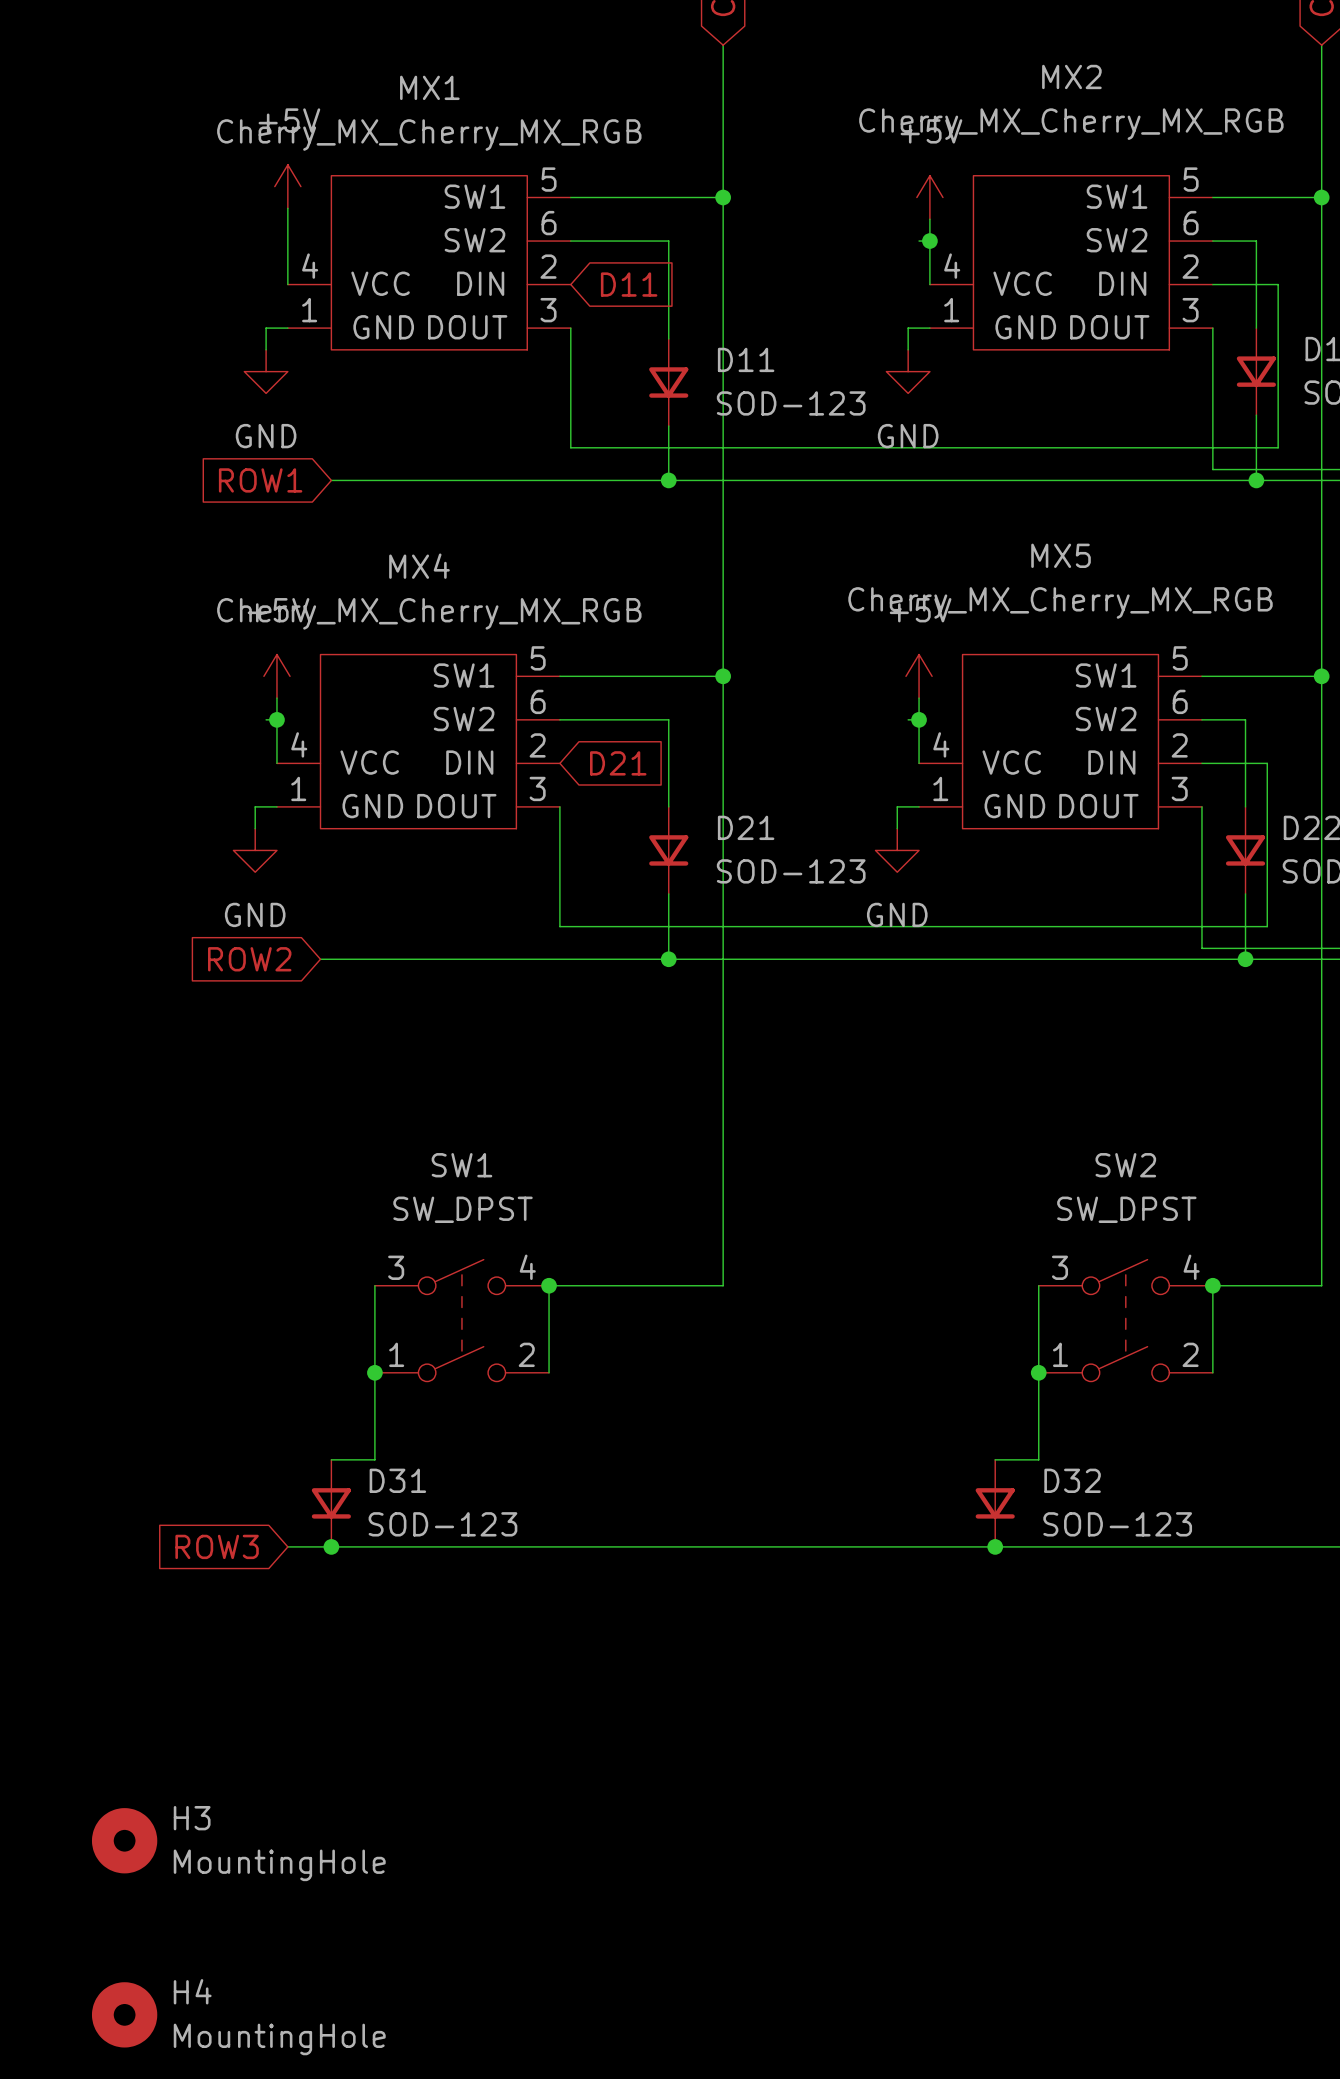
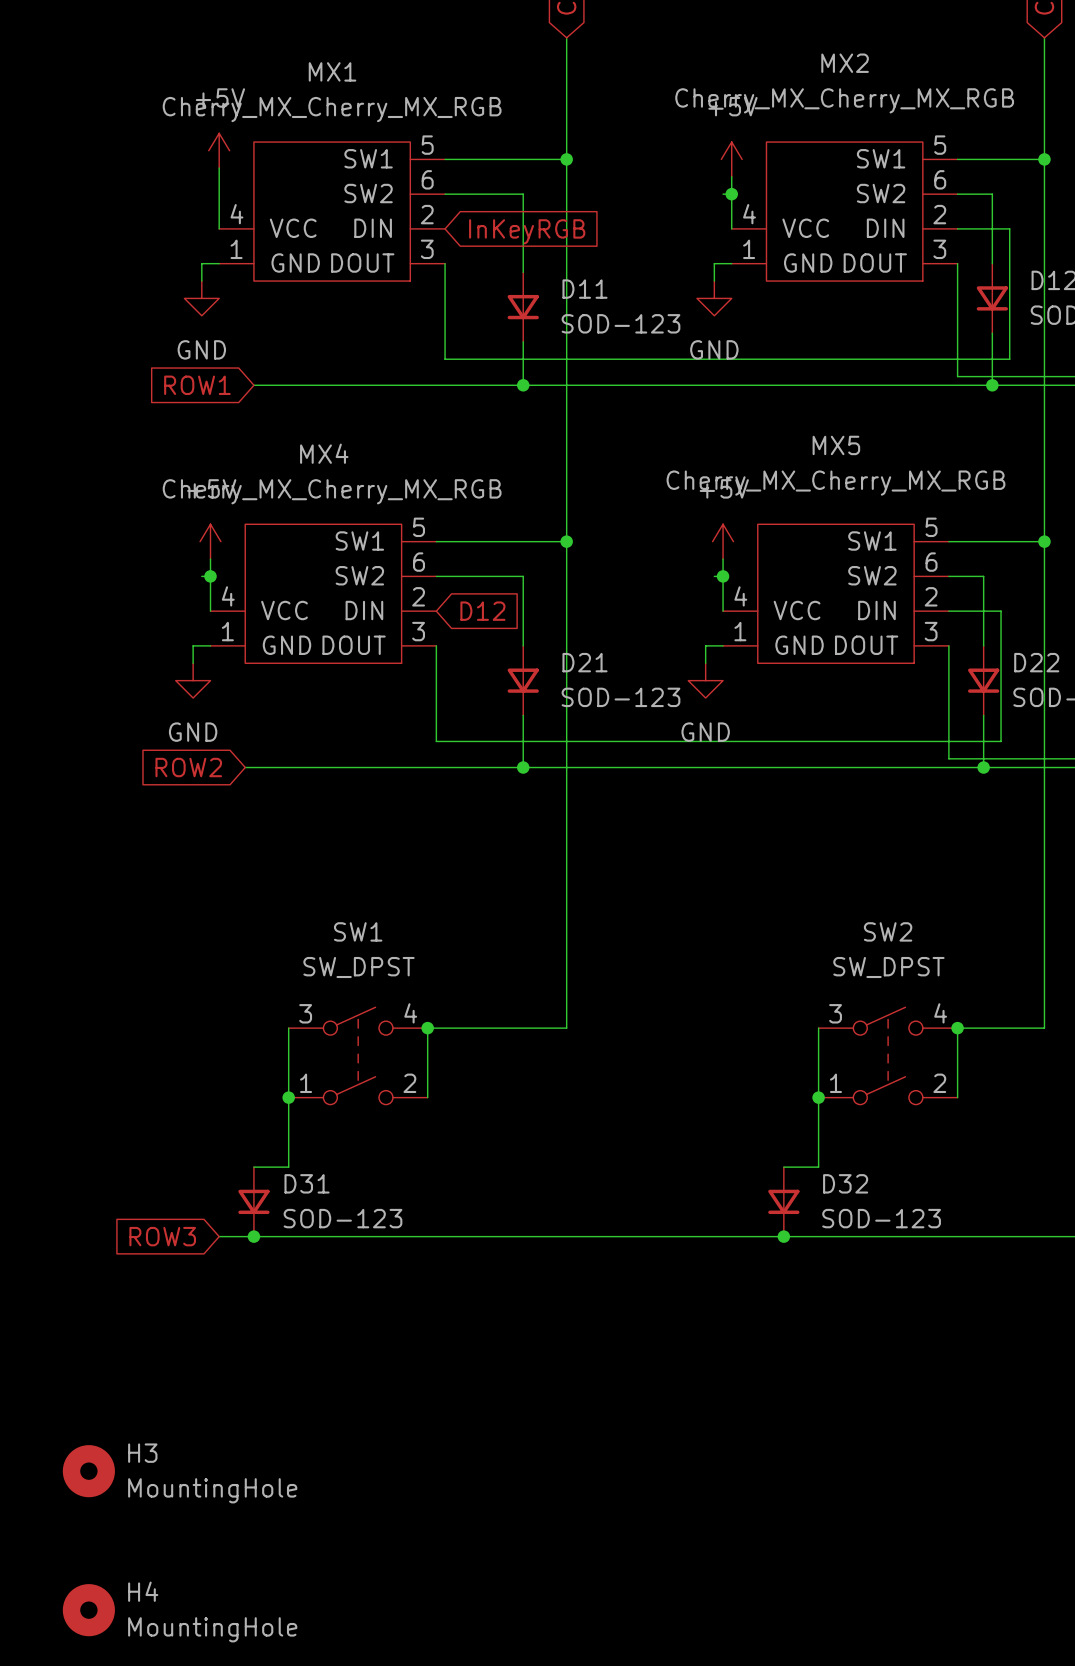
global label: D11 (629, 284) -> InKeyRGB (527, 231)
global label: D21 (618, 763) -> D12 (482, 611)

